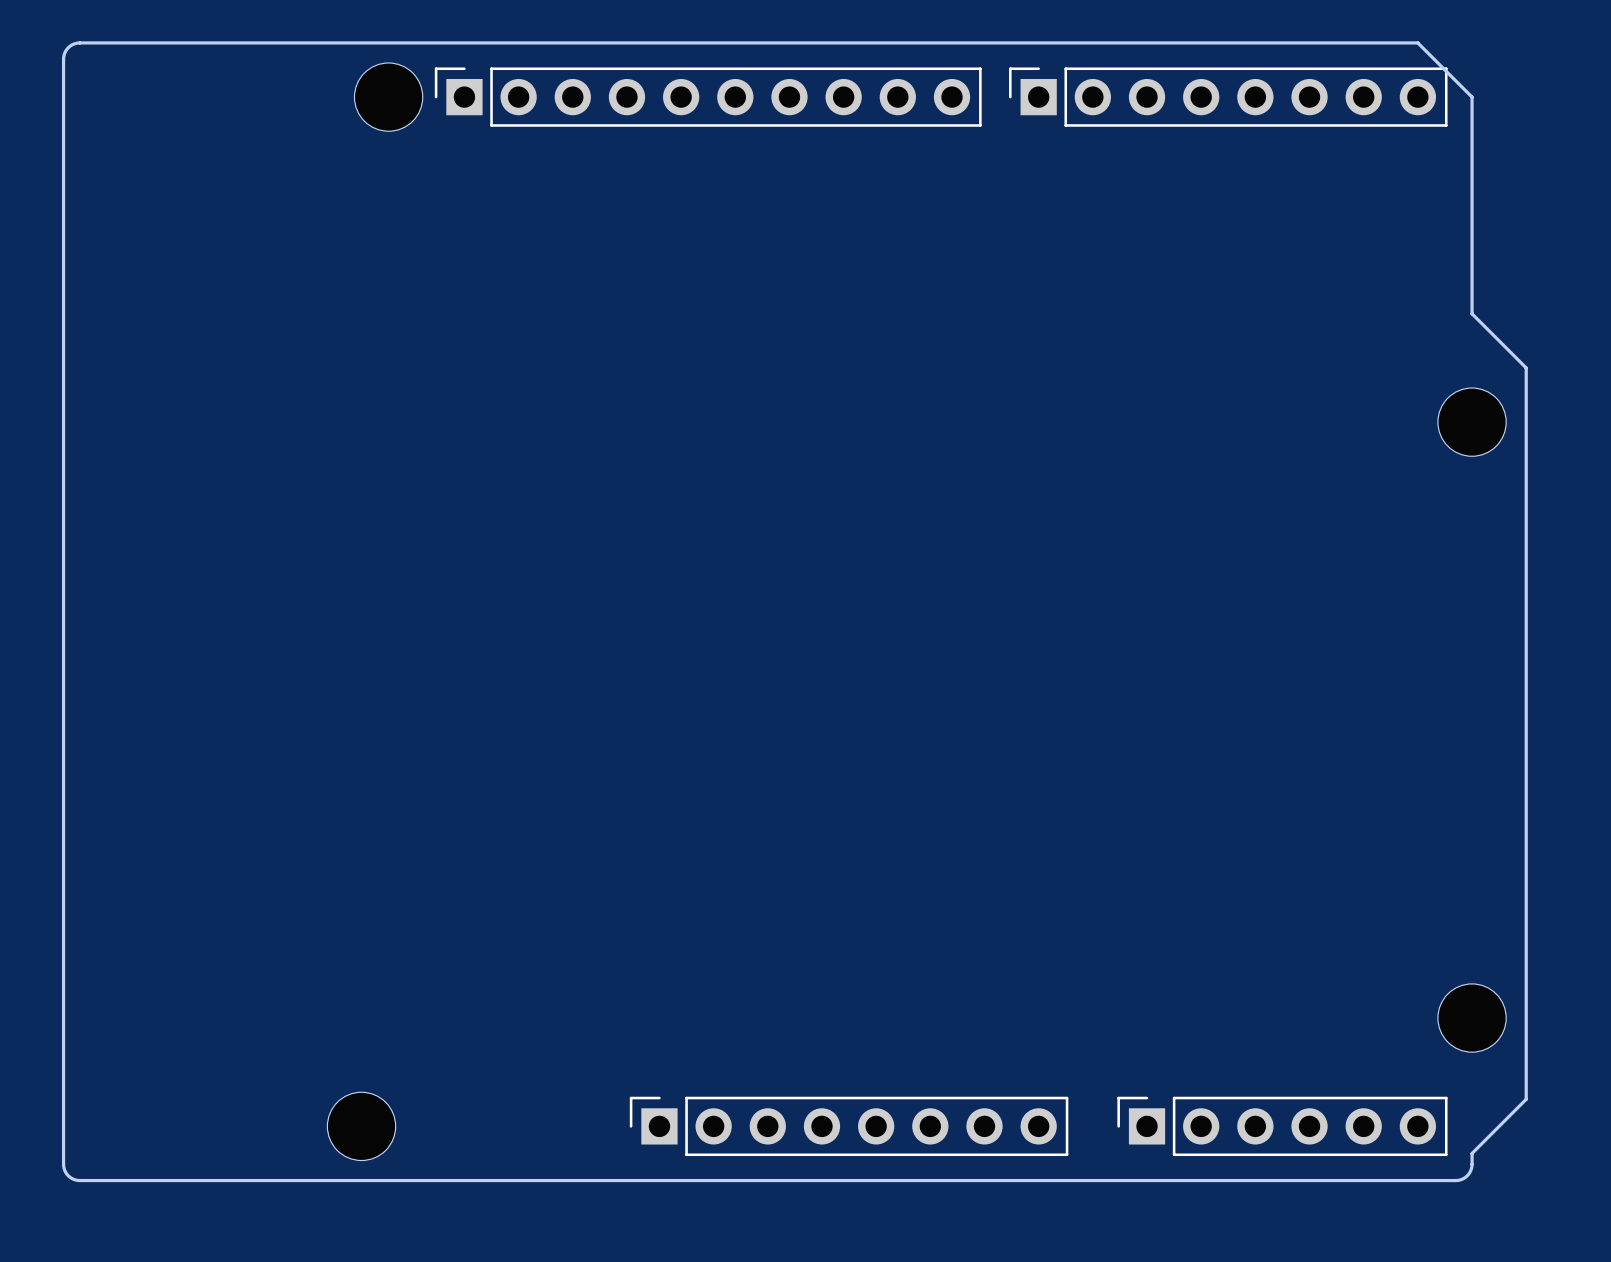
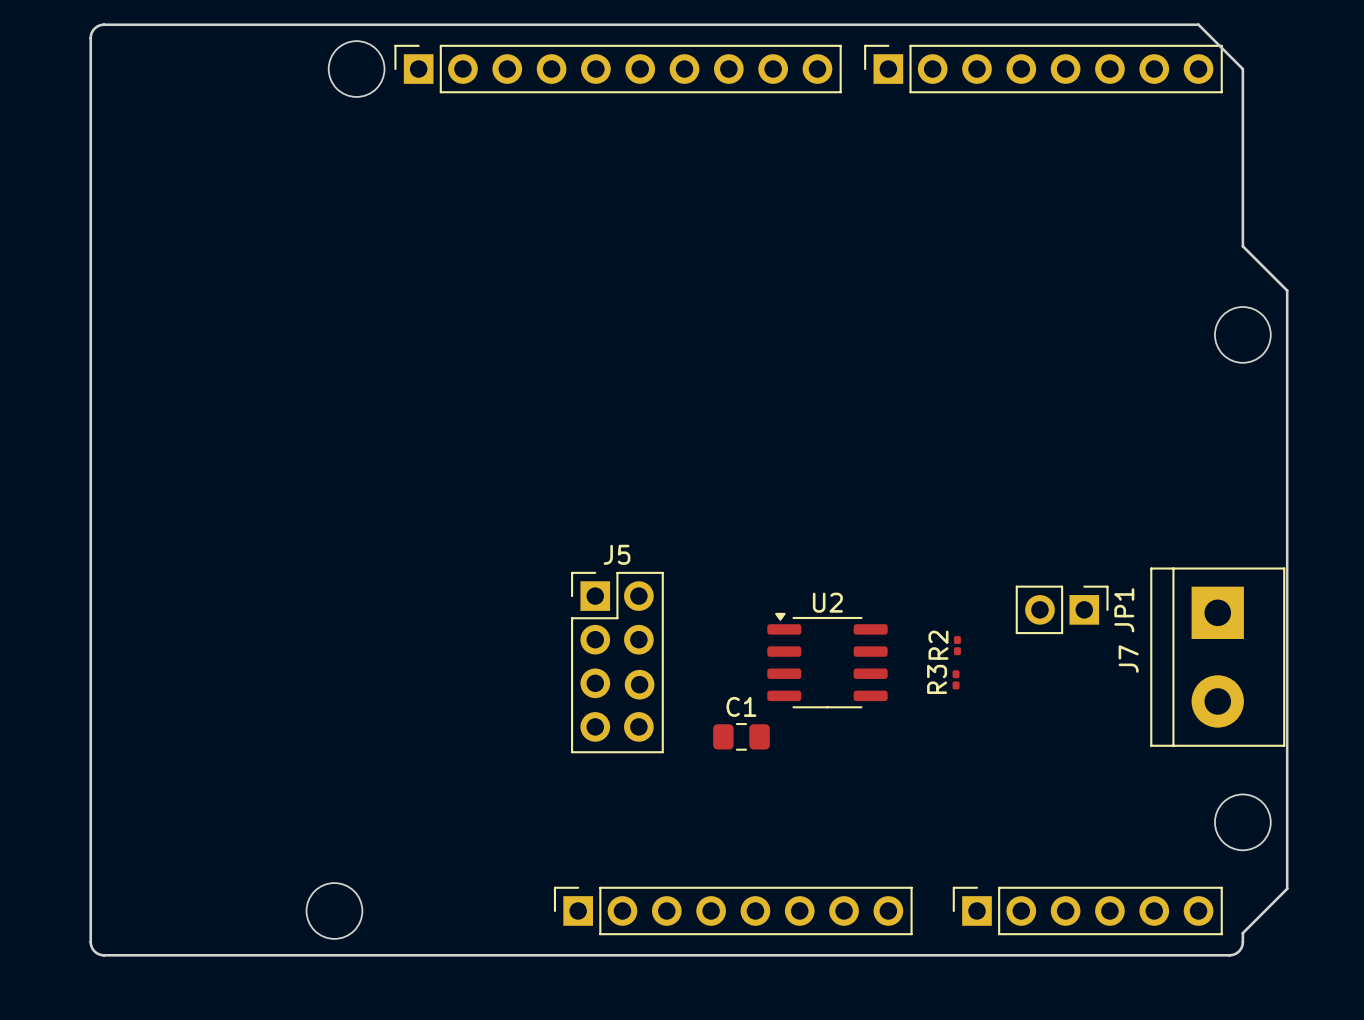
JP1: none -> (1062, 609)
R2: none -> (957, 645)
J7: none -> (1217, 657)
U2: none -> (827, 660)
J5: none -> (617, 662)
R3: none -> (956, 679)
C1: none -> (741, 736)

